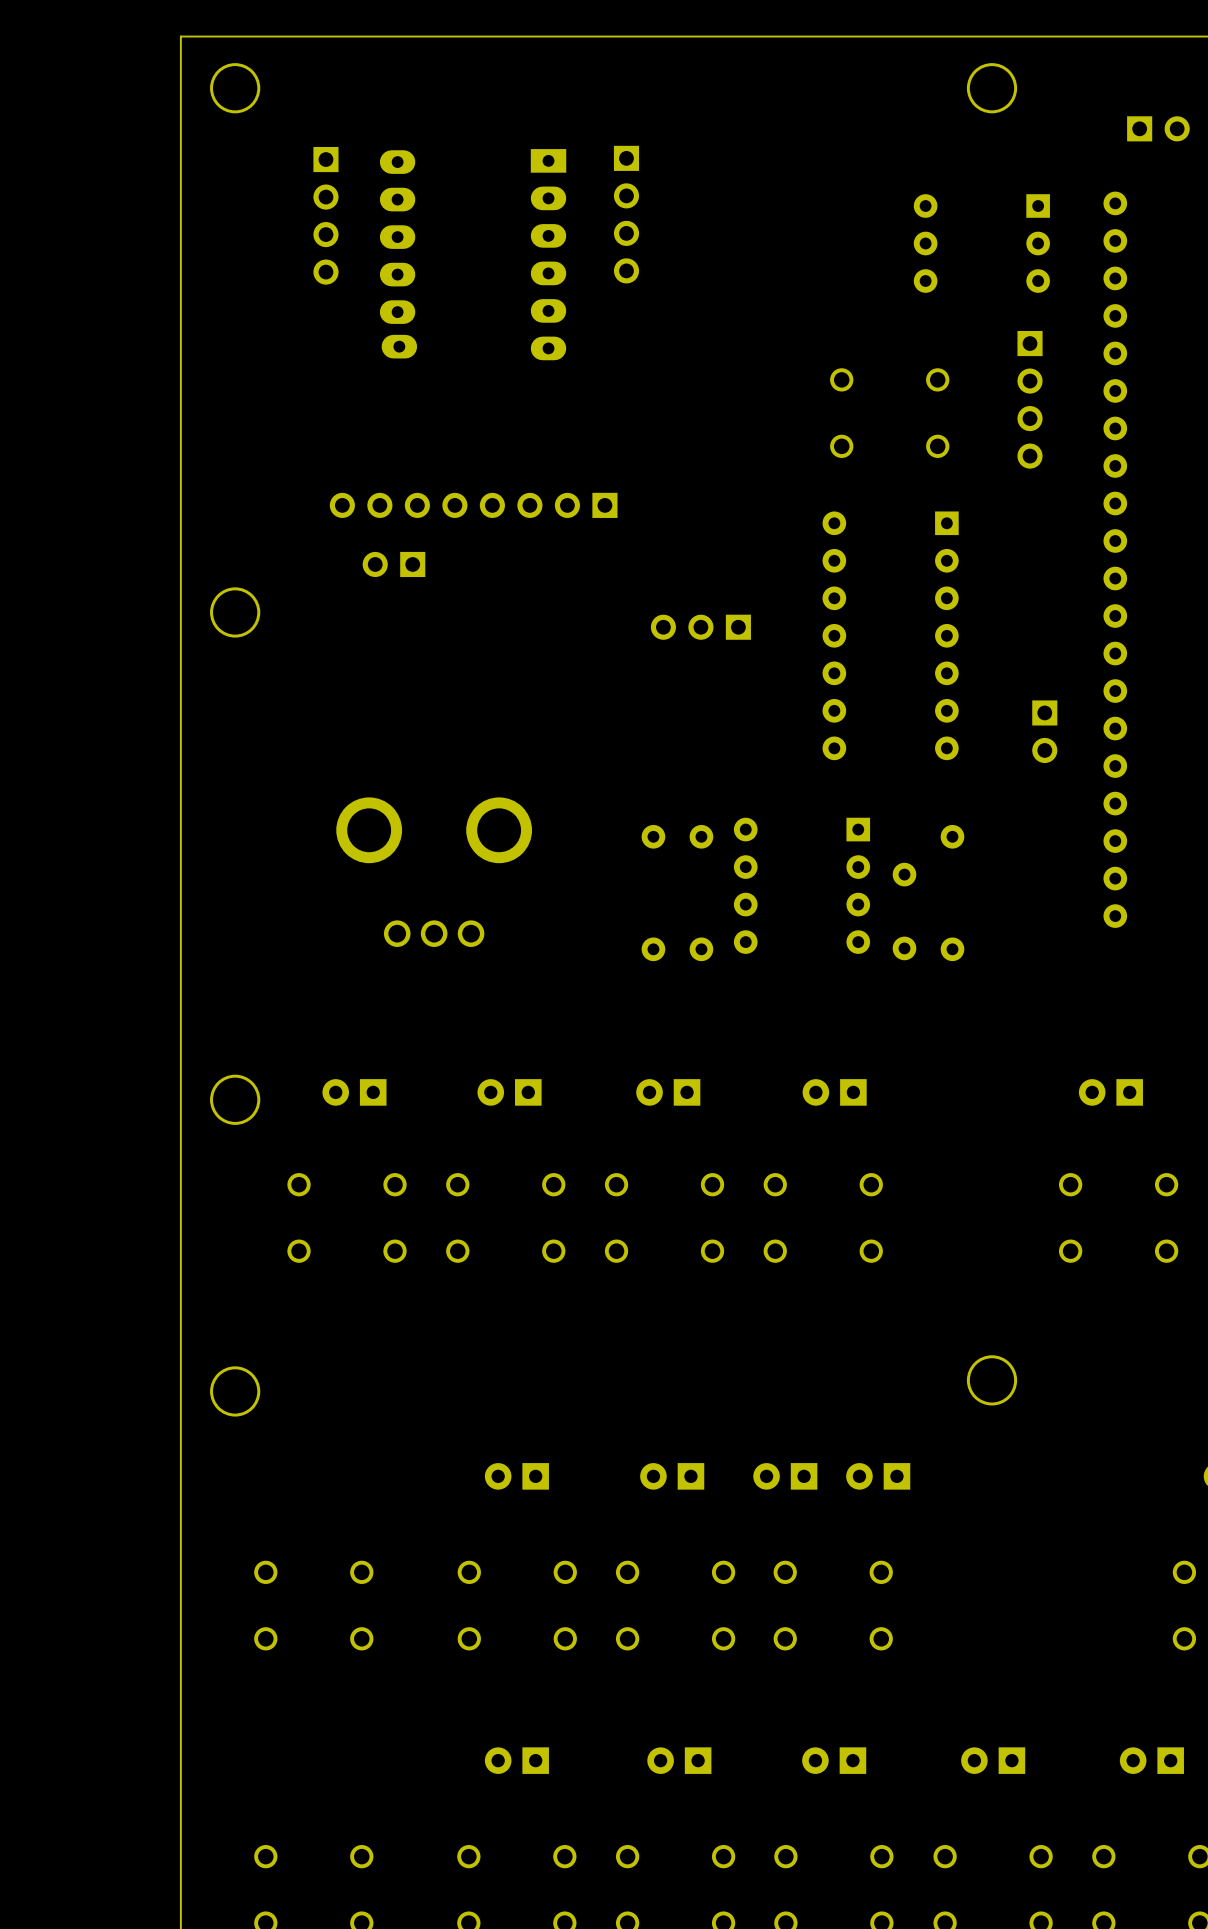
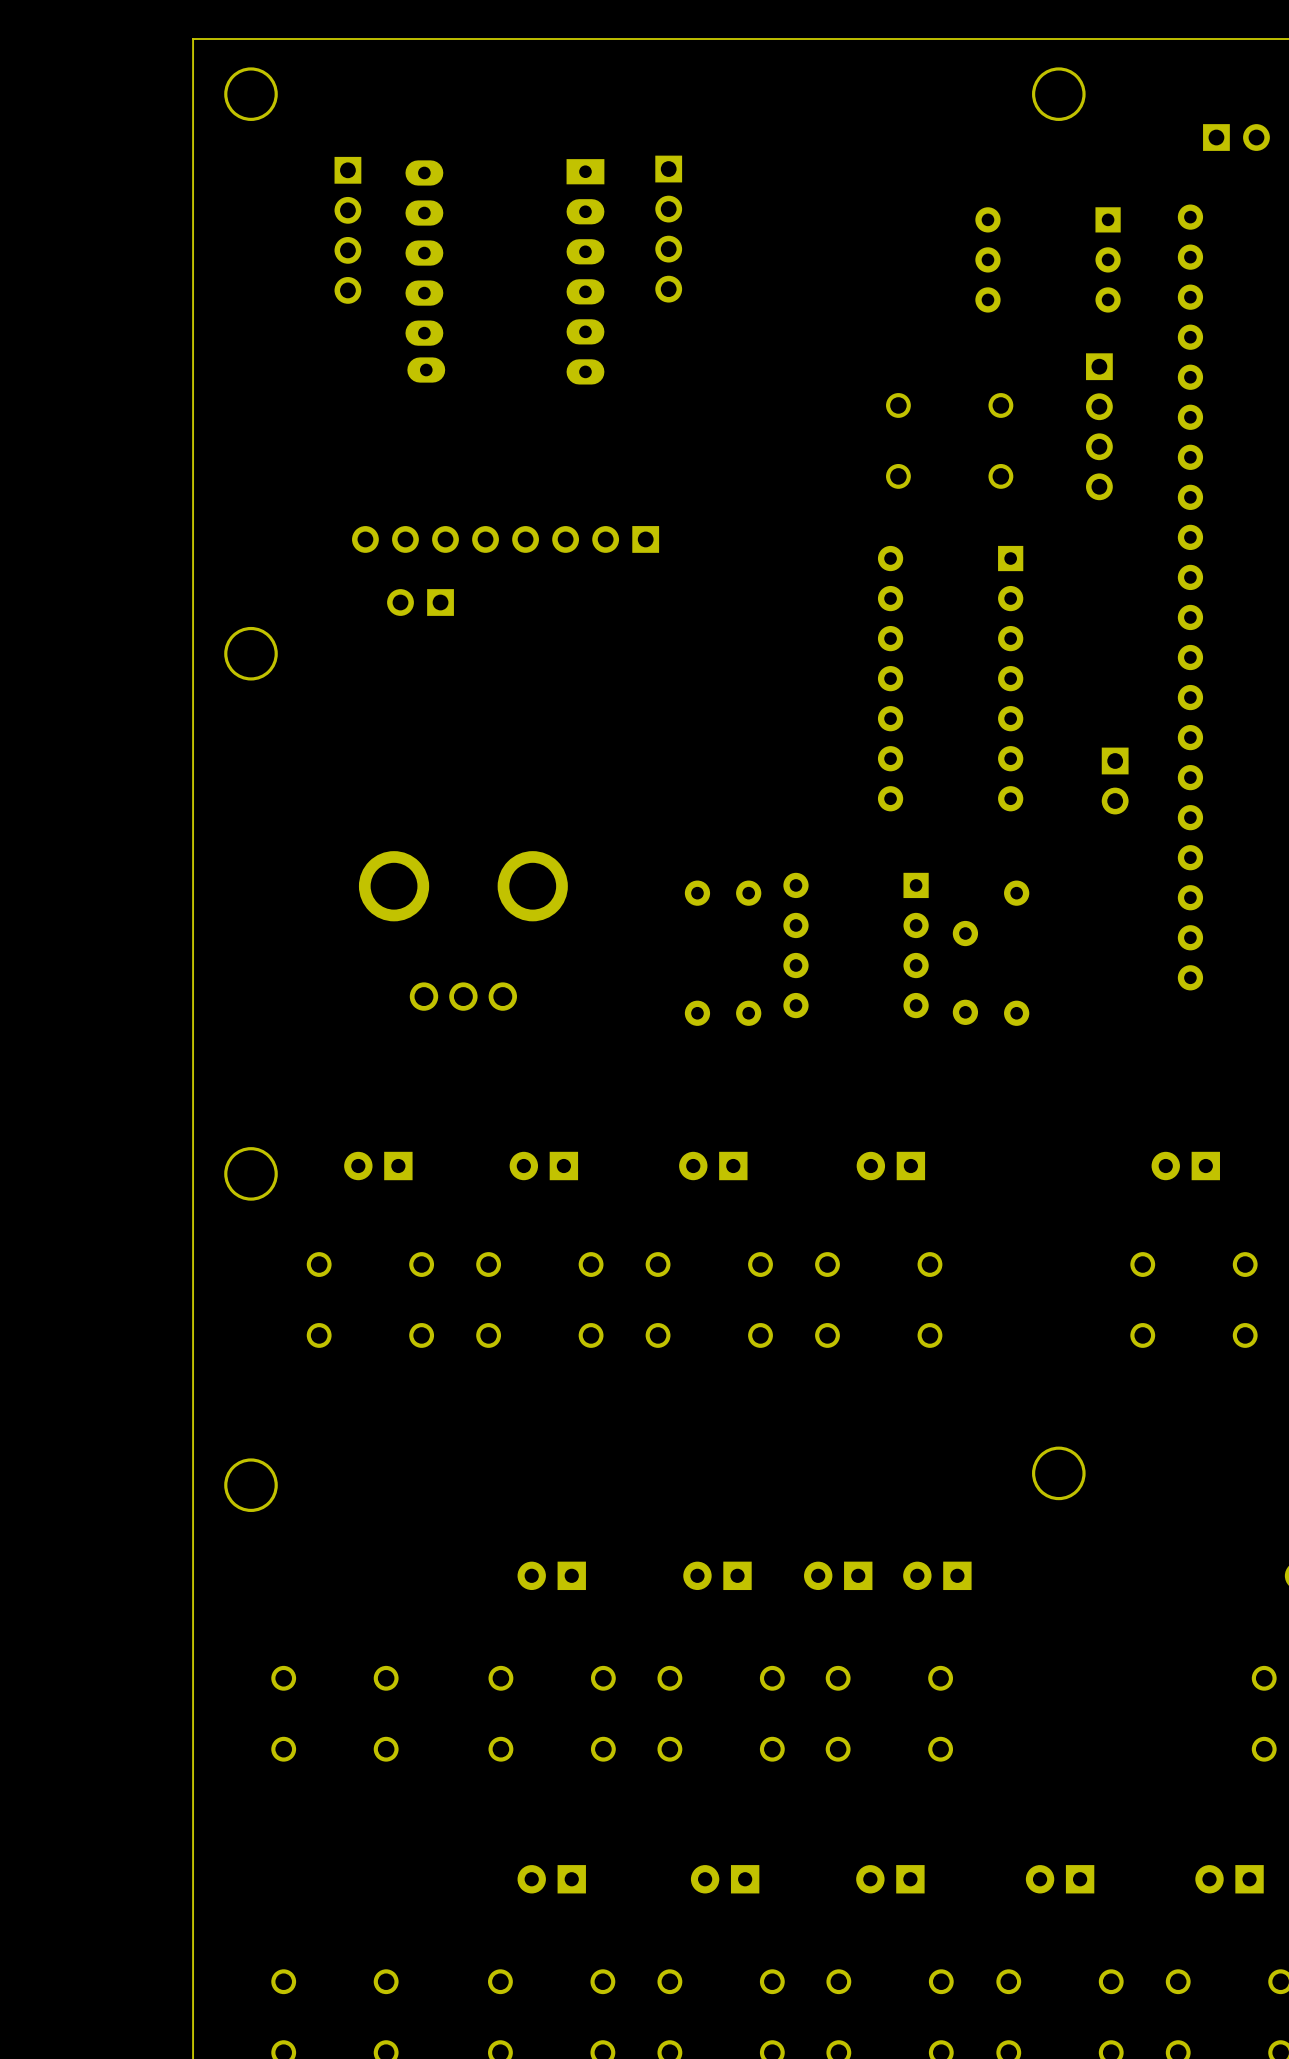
part: (700, 627) -> none

